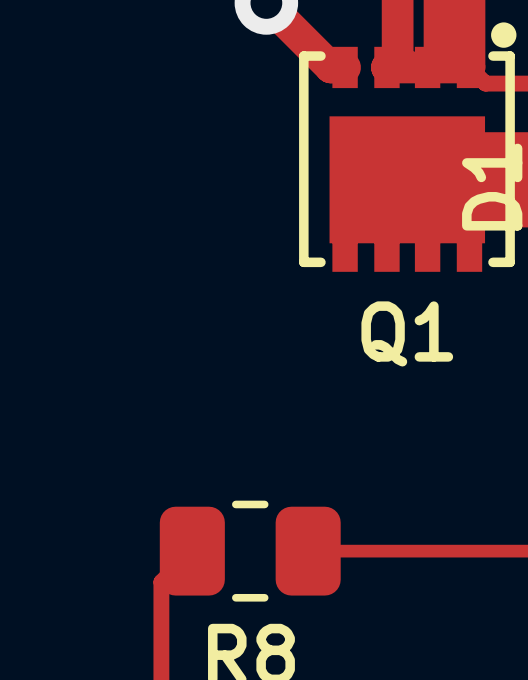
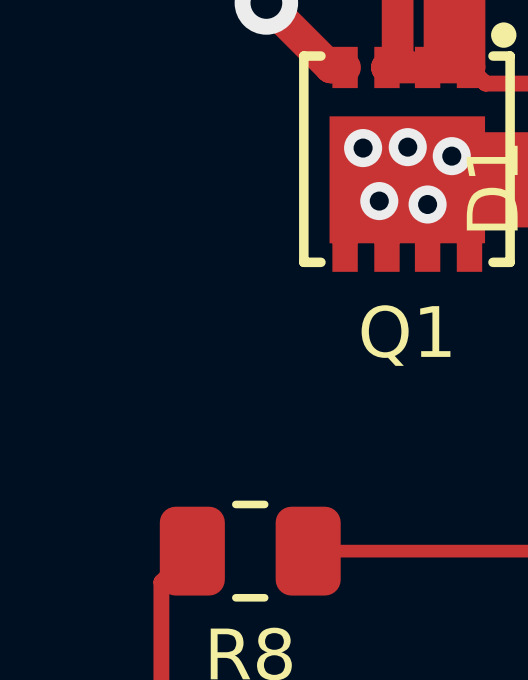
via: none -> (407, 147)
via: none -> (363, 148)
via: none -> (451, 156)
via: none -> (379, 201)
via: none -> (427, 204)

